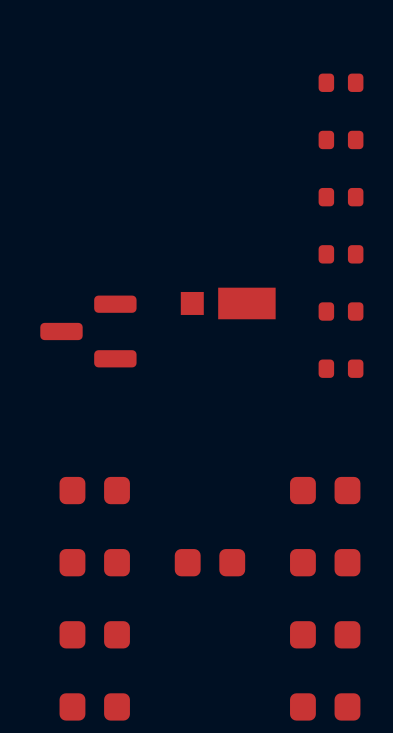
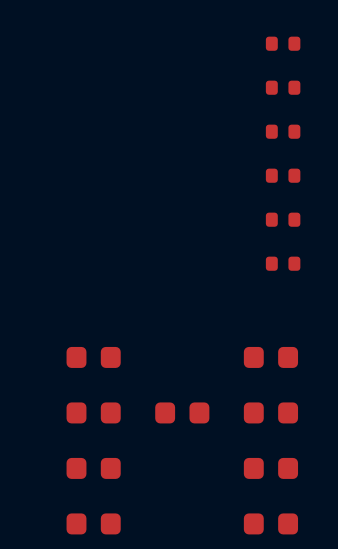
part: (228, 303) -> none
part: (88, 331) -> none

